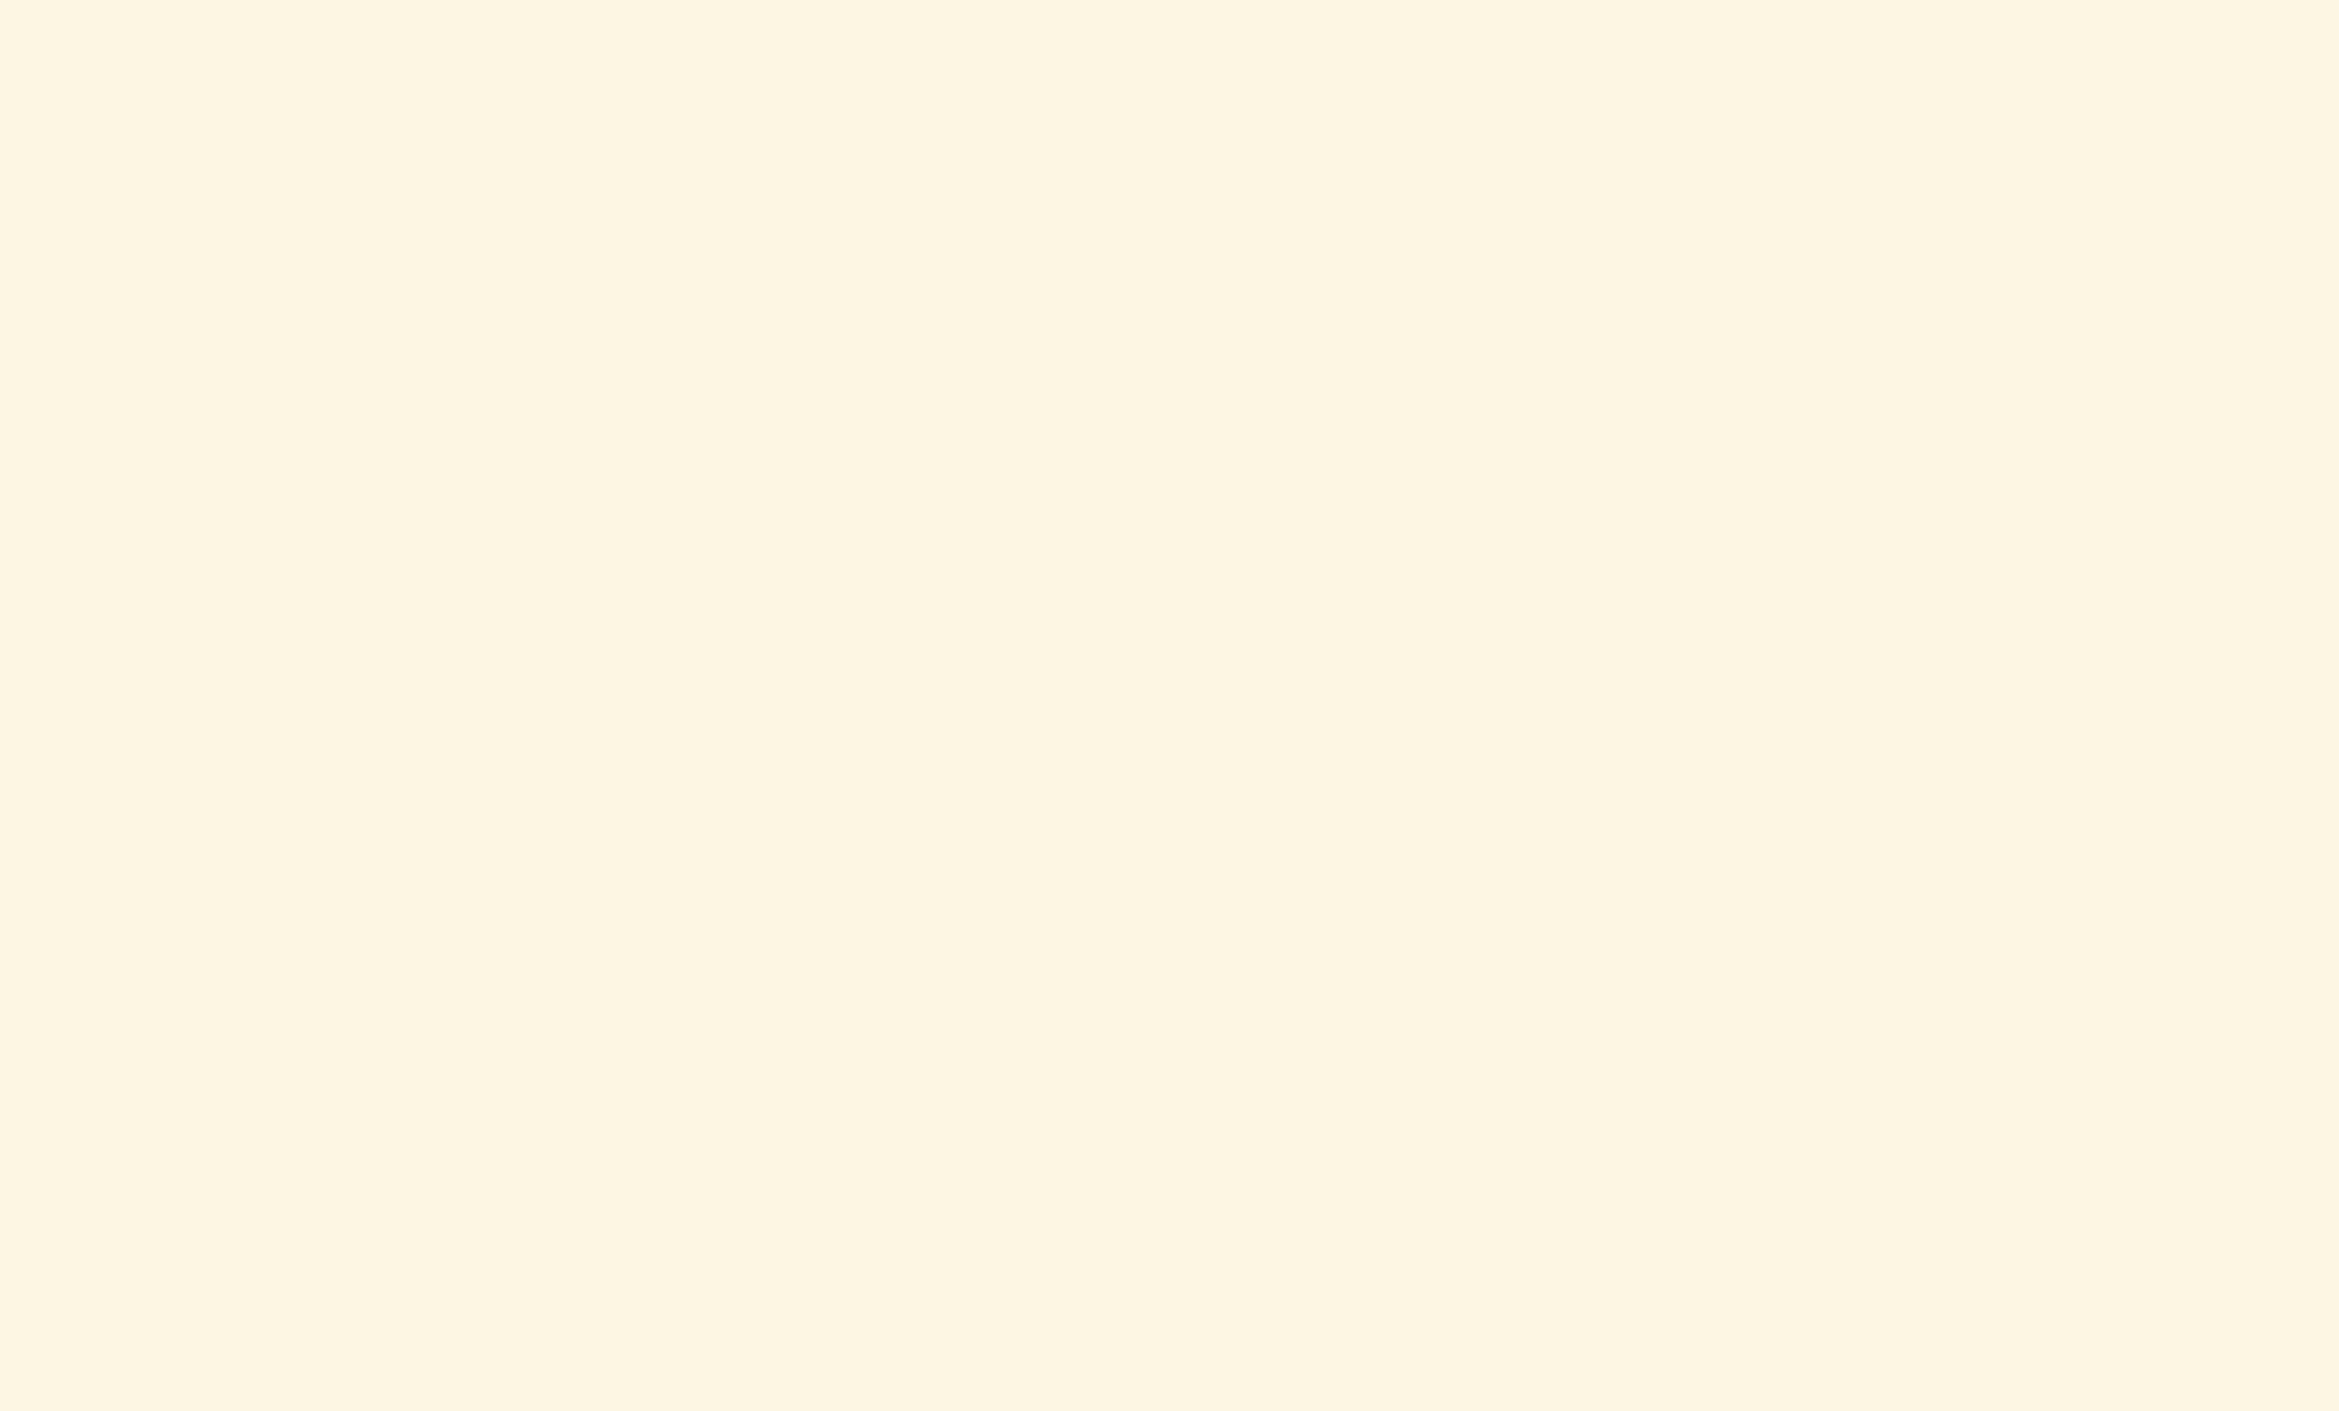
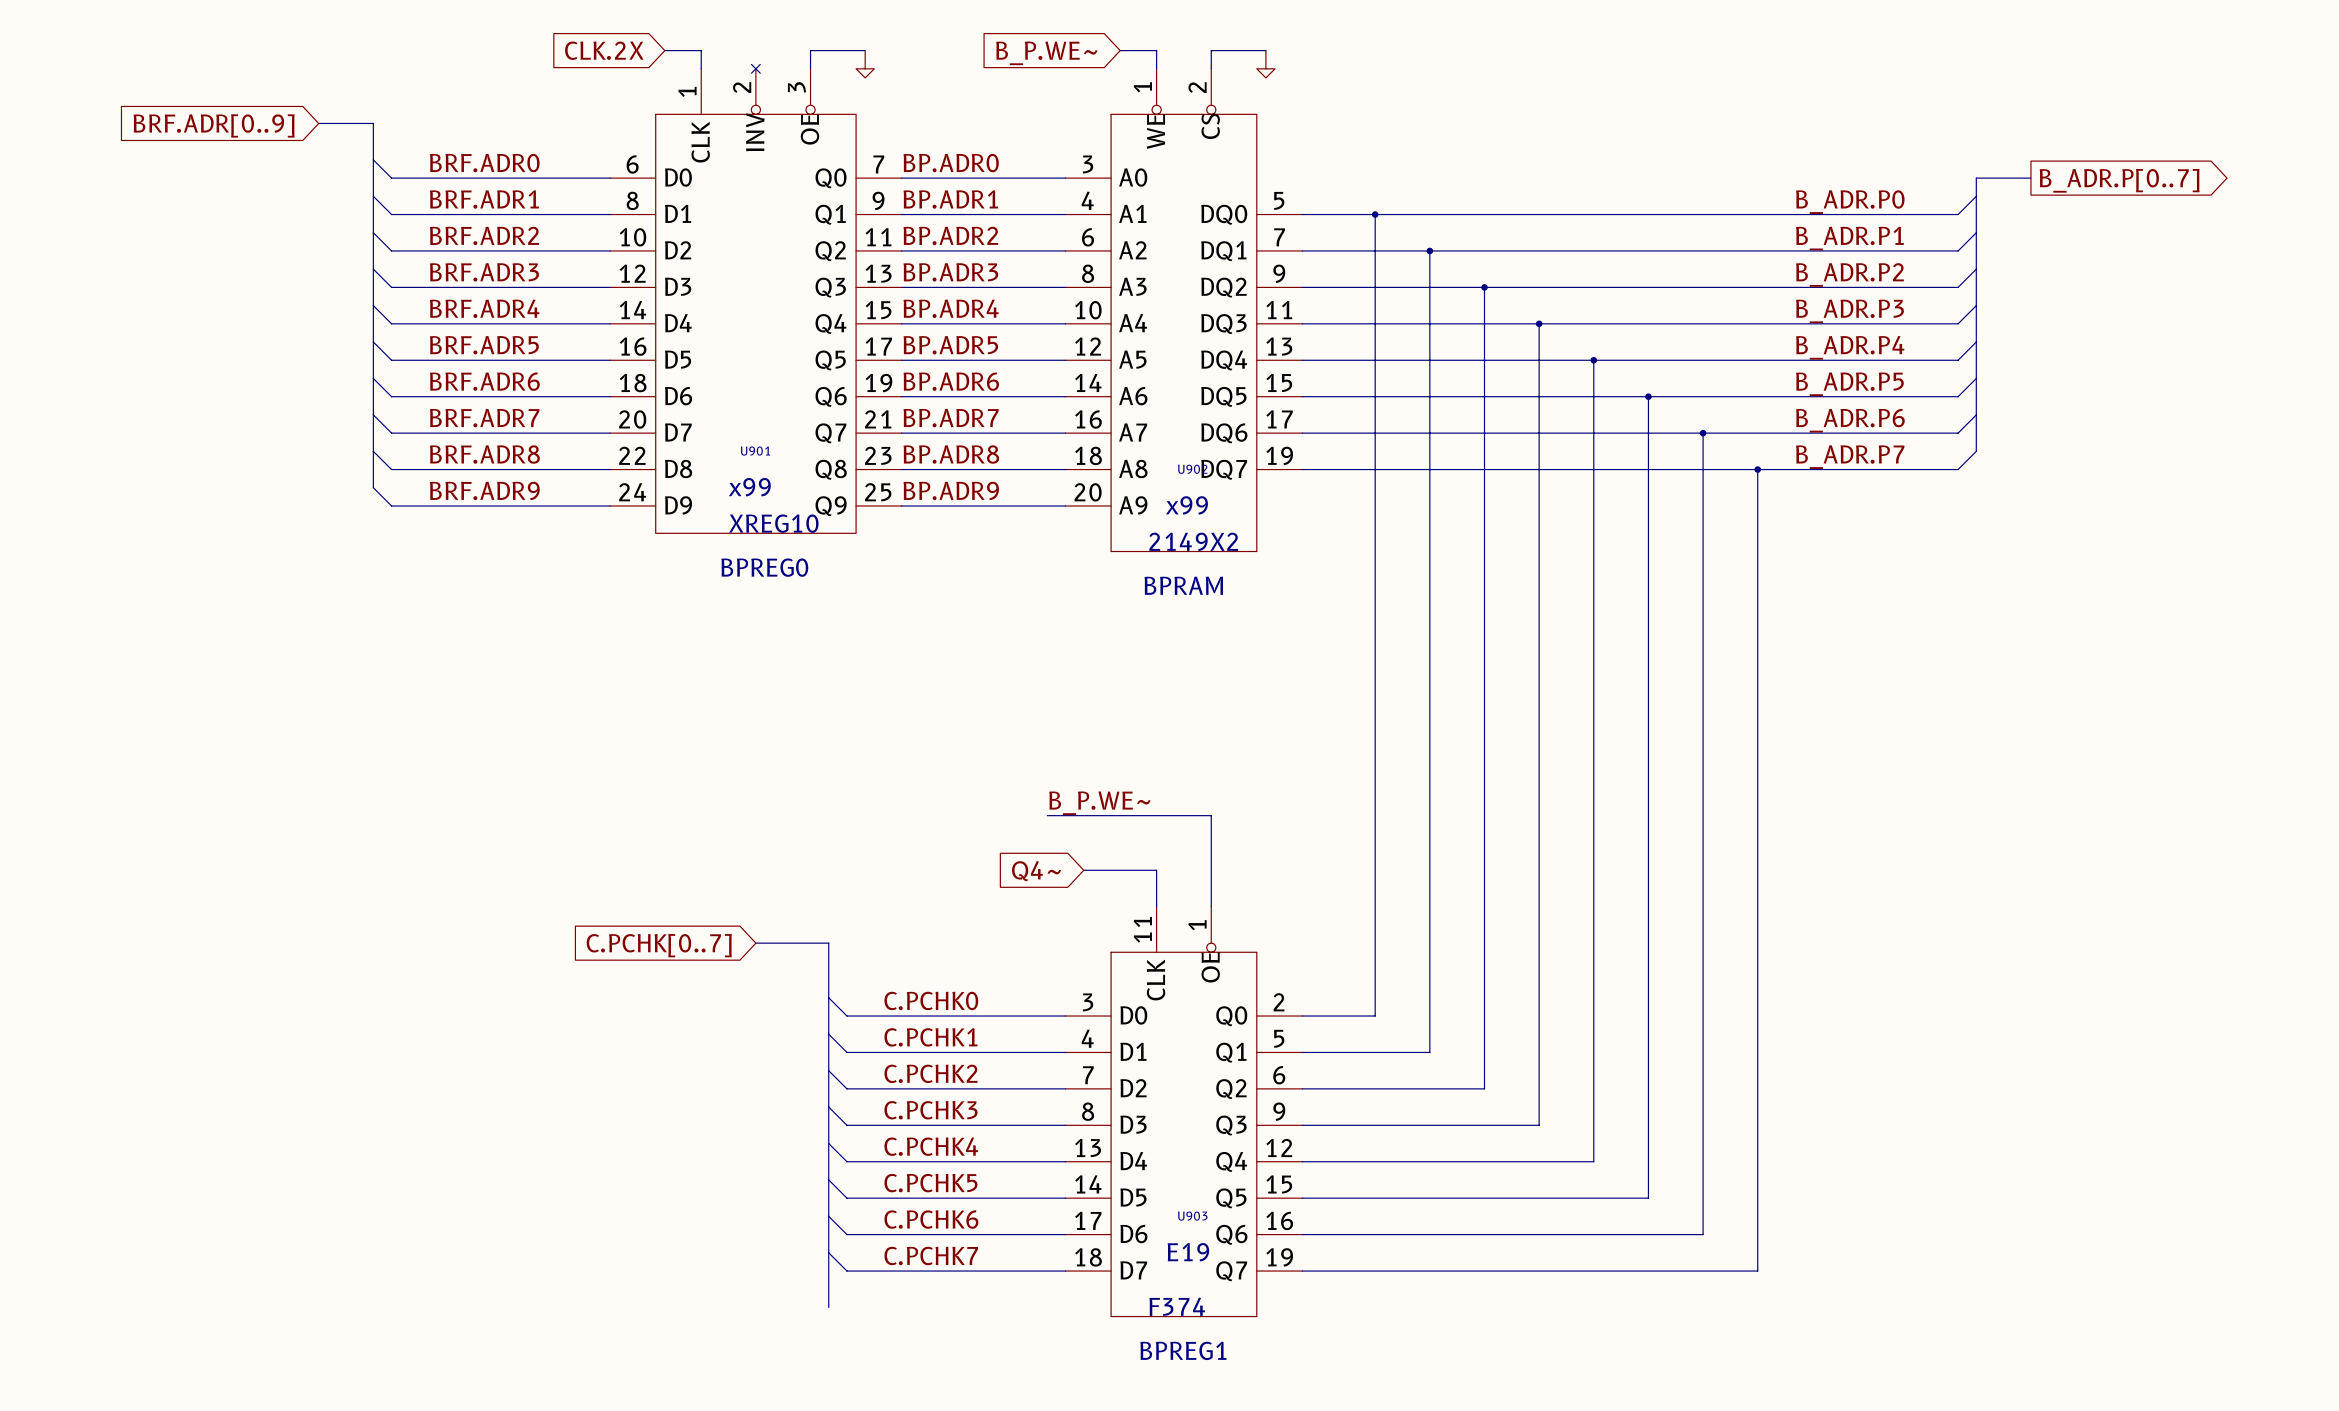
global label: none -> CLK.2X (604, 50)
wire: none -> (664, 50) (701, 50) (701, 68)
wire: none -> (865, 50) (810, 50) (810, 68)
wire: none -> (1120, 50) (1156, 50) (1156, 68)
wire: none -> (1265, 50) (1211, 50) (1211, 68)
global label: none -> B_P.WE~ (1046, 53)
power symbol: none -> (865, 64)
power symbol: none -> (1265, 64)
no-connect mark: none -> (755, 68)
bus: none -> (318, 123) (373, 123) (373, 487)
global label: none -> BRF.ADR[0..9] (214, 125)
wire: none -> (373, 159) (391, 178) (610, 178)
label: none -> BRF.ADR0 (484, 163)
label: none -> BP.ADR0 (951, 163)
wire: none -> (901, 178) (1065, 178)
bus: none -> (2030, 178) (1976, 178) (1976, 451)
global label: none -> B_ADR.P[0..7] (2119, 180)
wire: none -> (373, 196) (391, 214) (610, 214)
wire: none -> (1976, 196) (1958, 214) (1302, 214)
label: none -> BRF.ADR1 (484, 199)
label: none -> BP.ADR1 (950, 199)
label: none -> B_ADR.P0 (1850, 202)
wire: none -> (901, 214) (1065, 214)
wire: none -> (1375, 214) (1375, 1016) (1302, 1016)
junction: none -> (1375, 214)
wire: none -> (373, 232) (391, 250) (610, 250)
wire: none -> (1976, 232) (1958, 250) (1302, 250)
label: none -> BRF.ADR2 (484, 235)
label: none -> BP.ADR2 (950, 235)
label: none -> B_ADR.P1 (1849, 238)
wire: none -> (901, 250) (1065, 250)
wire: none -> (1429, 250) (1429, 1052) (1302, 1052)
junction: none -> (1429, 250)
wire: none -> (373, 269) (391, 287) (610, 287)
wire: none -> (1976, 269) (1958, 287) (1302, 287)
label: none -> BRF.ADR3 (484, 272)
label: none -> BP.ADR3 (950, 272)
label: none -> B_ADR.P2 (1849, 274)
wire: none -> (901, 287) (1065, 287)
wire: none -> (1484, 287) (1484, 1088) (1302, 1088)
junction: none -> (1484, 287)
U901: none -> XREG10 (755, 301)
wire: none -> (373, 305) (391, 323) (610, 323)
wire: none -> (1976, 305) (1958, 323) (1302, 323)
label: none -> BRF.ADR4 (484, 308)
label: none -> BP.ADR4 (951, 308)
label: none -> B_ADR.P3 (1849, 311)
U902: none -> 2149X2 (1183, 310)
wire: none -> (901, 323) (1065, 323)
wire: none -> (1539, 323) (1539, 1125) (1302, 1125)
junction: none -> (1539, 323)
wire: none -> (373, 342) (391, 360) (610, 360)
wire: none -> (1976, 342) (1958, 360) (1302, 360)
label: none -> BRF.ADR5 (484, 345)
label: none -> BP.ADR5 (950, 345)
label: none -> B_ADR.P4 (1850, 347)
wire: none -> (901, 360) (1065, 360)
wire: none -> (1593, 360) (1593, 1161) (1302, 1161)
junction: none -> (1593, 360)
wire: none -> (373, 378) (391, 396) (610, 396)
wire: none -> (1976, 378) (1958, 396) (1302, 396)
label: none -> BRF.ADR6 (484, 381)
label: none -> BP.ADR6 (951, 381)
label: none -> B_ADR.P5 (1849, 384)
wire: none -> (901, 396) (1065, 396)
wire: none -> (1648, 396) (1648, 1198) (1302, 1198)
junction: none -> (1648, 396)
wire: none -> (373, 414) (391, 433) (610, 433)
wire: none -> (1976, 414) (1958, 433) (1302, 433)
label: none -> BRF.ADR7 (484, 418)
label: none -> BP.ADR7 (951, 418)
label: none -> B_ADR.P6 (1850, 420)
wire: none -> (901, 433) (1065, 433)
wire: none -> (1703, 433) (1703, 1234) (1302, 1234)
junction: none -> (1703, 433)
wire: none -> (373, 451) (391, 469) (610, 469)
wire: none -> (1976, 451) (1958, 469) (1302, 469)
label: none -> BRF.ADR8 (484, 454)
label: none -> BP.ADR8 (951, 454)
label: none -> B_ADR.P7 (1850, 457)
wire: none -> (901, 469) (1065, 469)
wire: none -> (1757, 469) (1757, 1271) (1302, 1271)
junction: none -> (1757, 469)
wire: none -> (373, 487) (391, 505) (610, 505)
label: none -> BRF.ADR9 (484, 490)
label: none -> BP.ADR9 (951, 490)
wire: none -> (901, 505) (1065, 505)
label: none -> B_P.WE~ (1099, 803)
wire: none -> (1047, 815) (1211, 815) (1211, 906)
global label: none -> Q4~ (1036, 871)
wire: none -> (1083, 870) (1156, 870) (1156, 906)
bus: none -> (755, 943) (828, 943) (828, 1307)
global label: none -> C.PCHK[0..7] (659, 945)
wire: none -> (828, 997) (846, 1016) (1065, 1016)
label: none -> C.PCHK0 (931, 1000)
wire: none -> (828, 1034) (846, 1052) (1065, 1052)
label: none -> C.PCHK1 (930, 1037)
wire: none -> (828, 1070) (846, 1088) (1065, 1088)
label: none -> C.PCHK2 (931, 1073)
wire: none -> (828, 1107) (846, 1125) (1065, 1125)
label: none -> C.PCHK3 (931, 1110)
U903: none -> F374 (1183, 1111)
wire: none -> (828, 1143) (846, 1161) (1065, 1161)
label: none -> C.PCHK4 (931, 1146)
wire: none -> (828, 1179) (846, 1198) (1065, 1198)
label: none -> C.PCHK5 (930, 1183)
wire: none -> (828, 1216) (846, 1234) (1065, 1234)
label: none -> C.PCHK6 (931, 1219)
wire: none -> (828, 1252) (846, 1271) (1065, 1271)
label: none -> C.PCHK7 (931, 1255)

